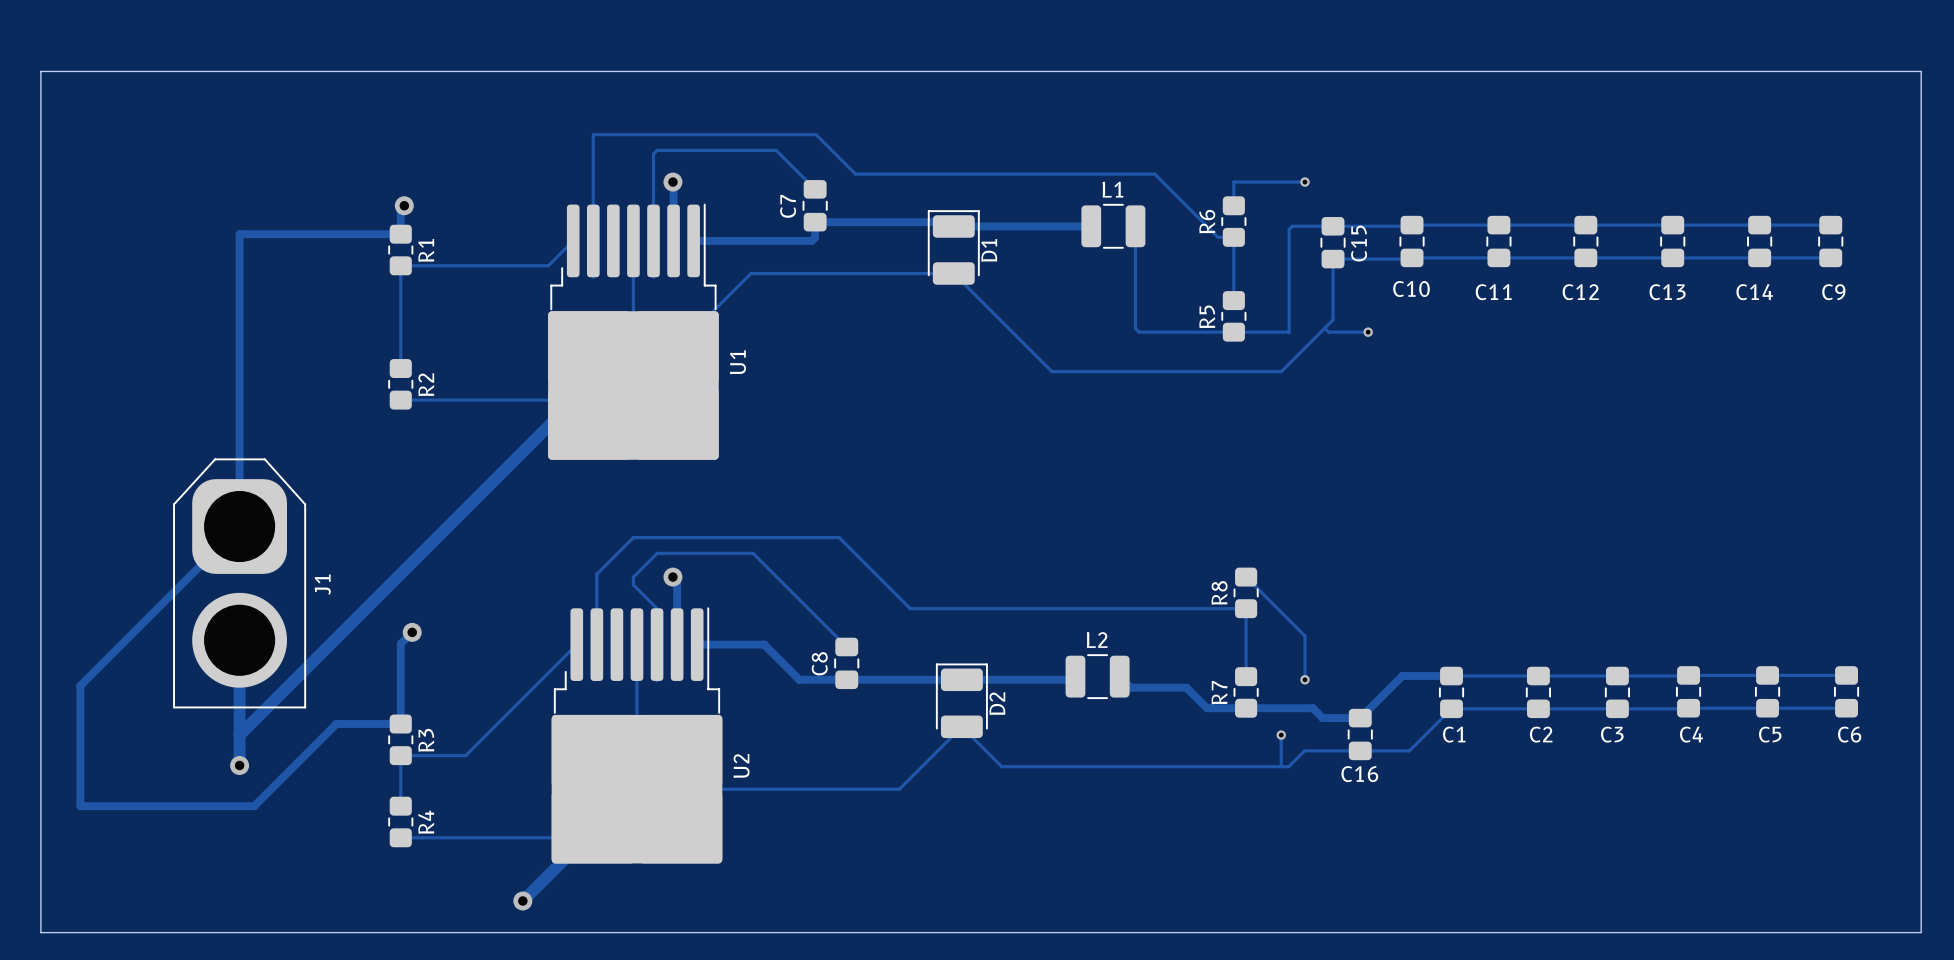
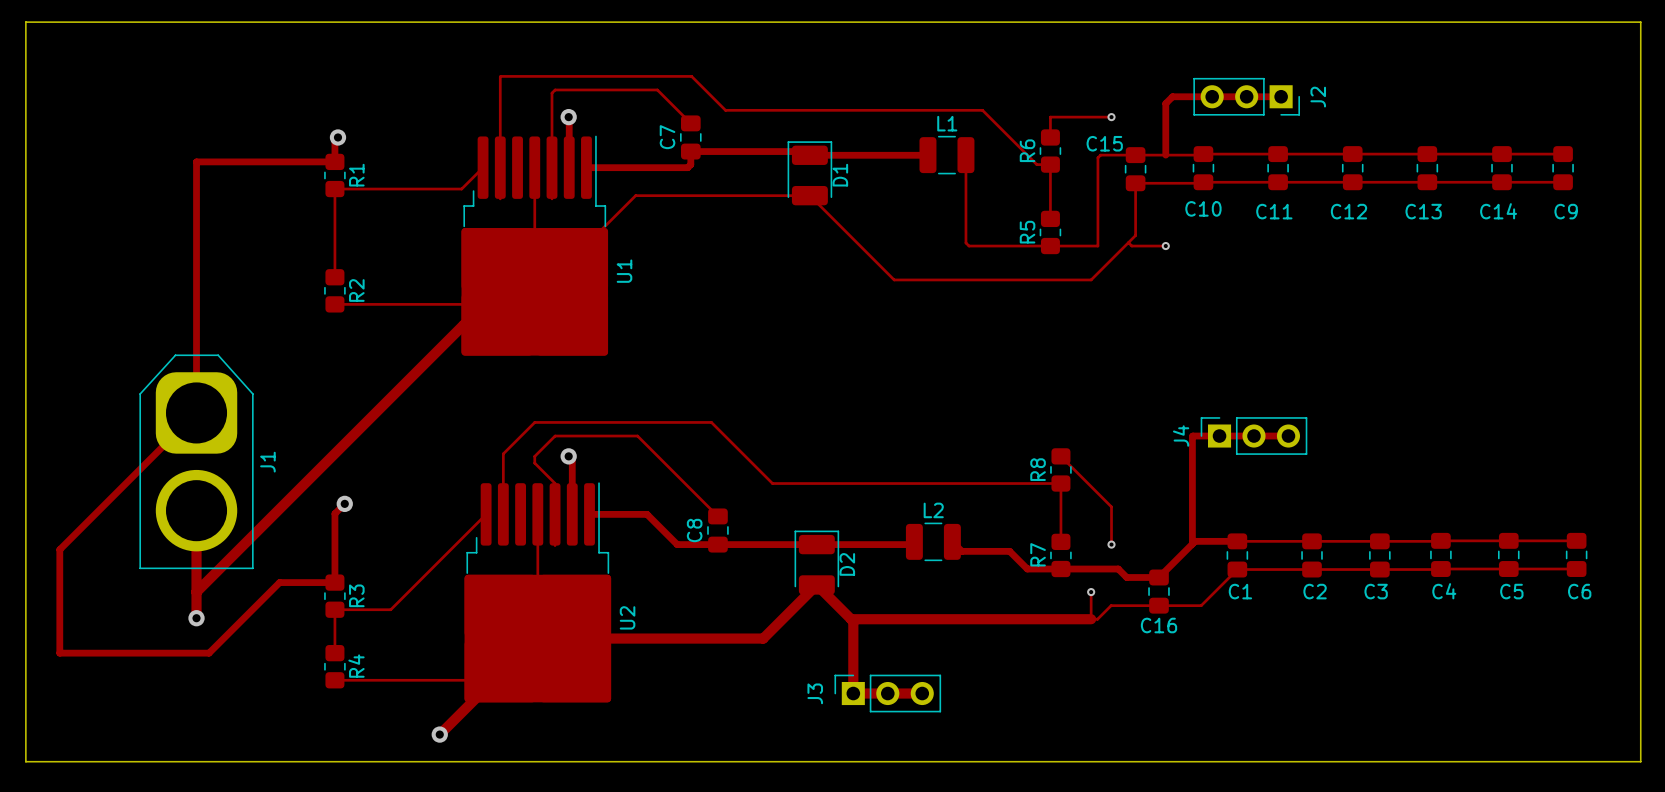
J2: none -> (1246, 96)
track: none -> (1281, 96) (1172, 96) (1165, 103) (1165, 155)
C15 name rotation: 0° (1359, 243) -> 90° clockwise (1104, 143)
C15 name position: C15 (1359, 243) -> C15 (1104, 143)
J4: none -> (1253, 436)
track: none -> (1288, 436) (1192, 436) (1192, 544)
track: none -> (851, 619) (853, 621) (853, 693) (922, 693)
track width: thin (1281, 766) (1001, 766) (961, 726) (899, 789) (636, 789) -> thick (1091, 619) (851, 619) (816, 584) (763, 638) (537, 638)
J3: none -> (887, 693)

